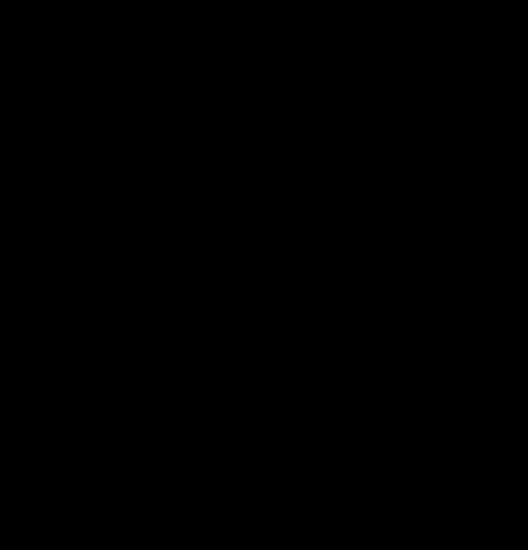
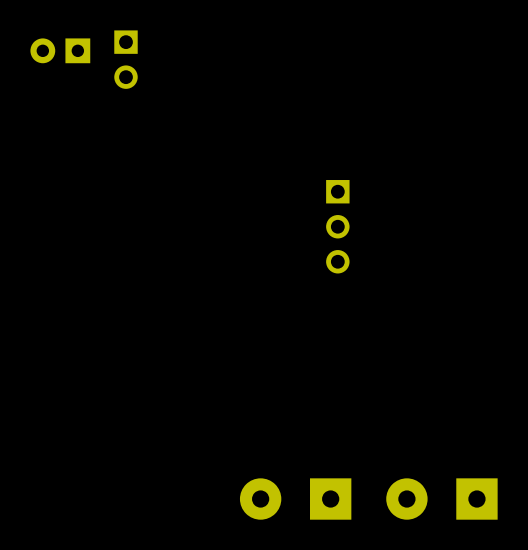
part: none -> (60, 50)
part: none -> (125, 59)
part: none -> (337, 226)
part: none -> (295, 499)
part: none -> (441, 499)

